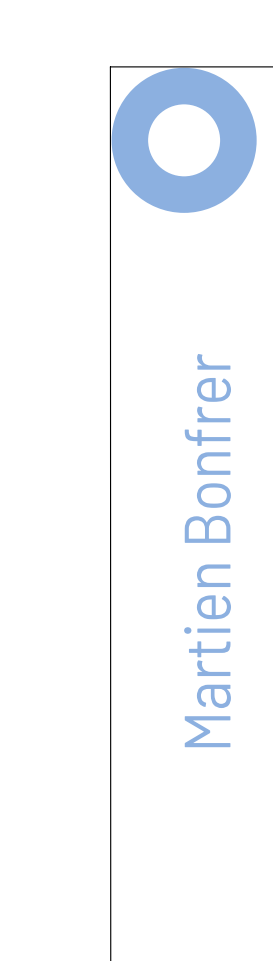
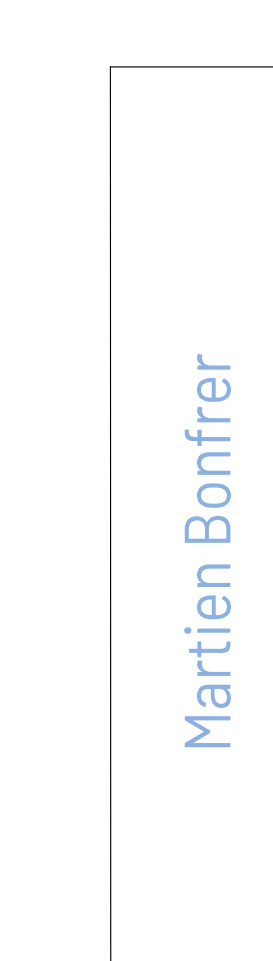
drawing: [111, 67, 257, 213] -> none

